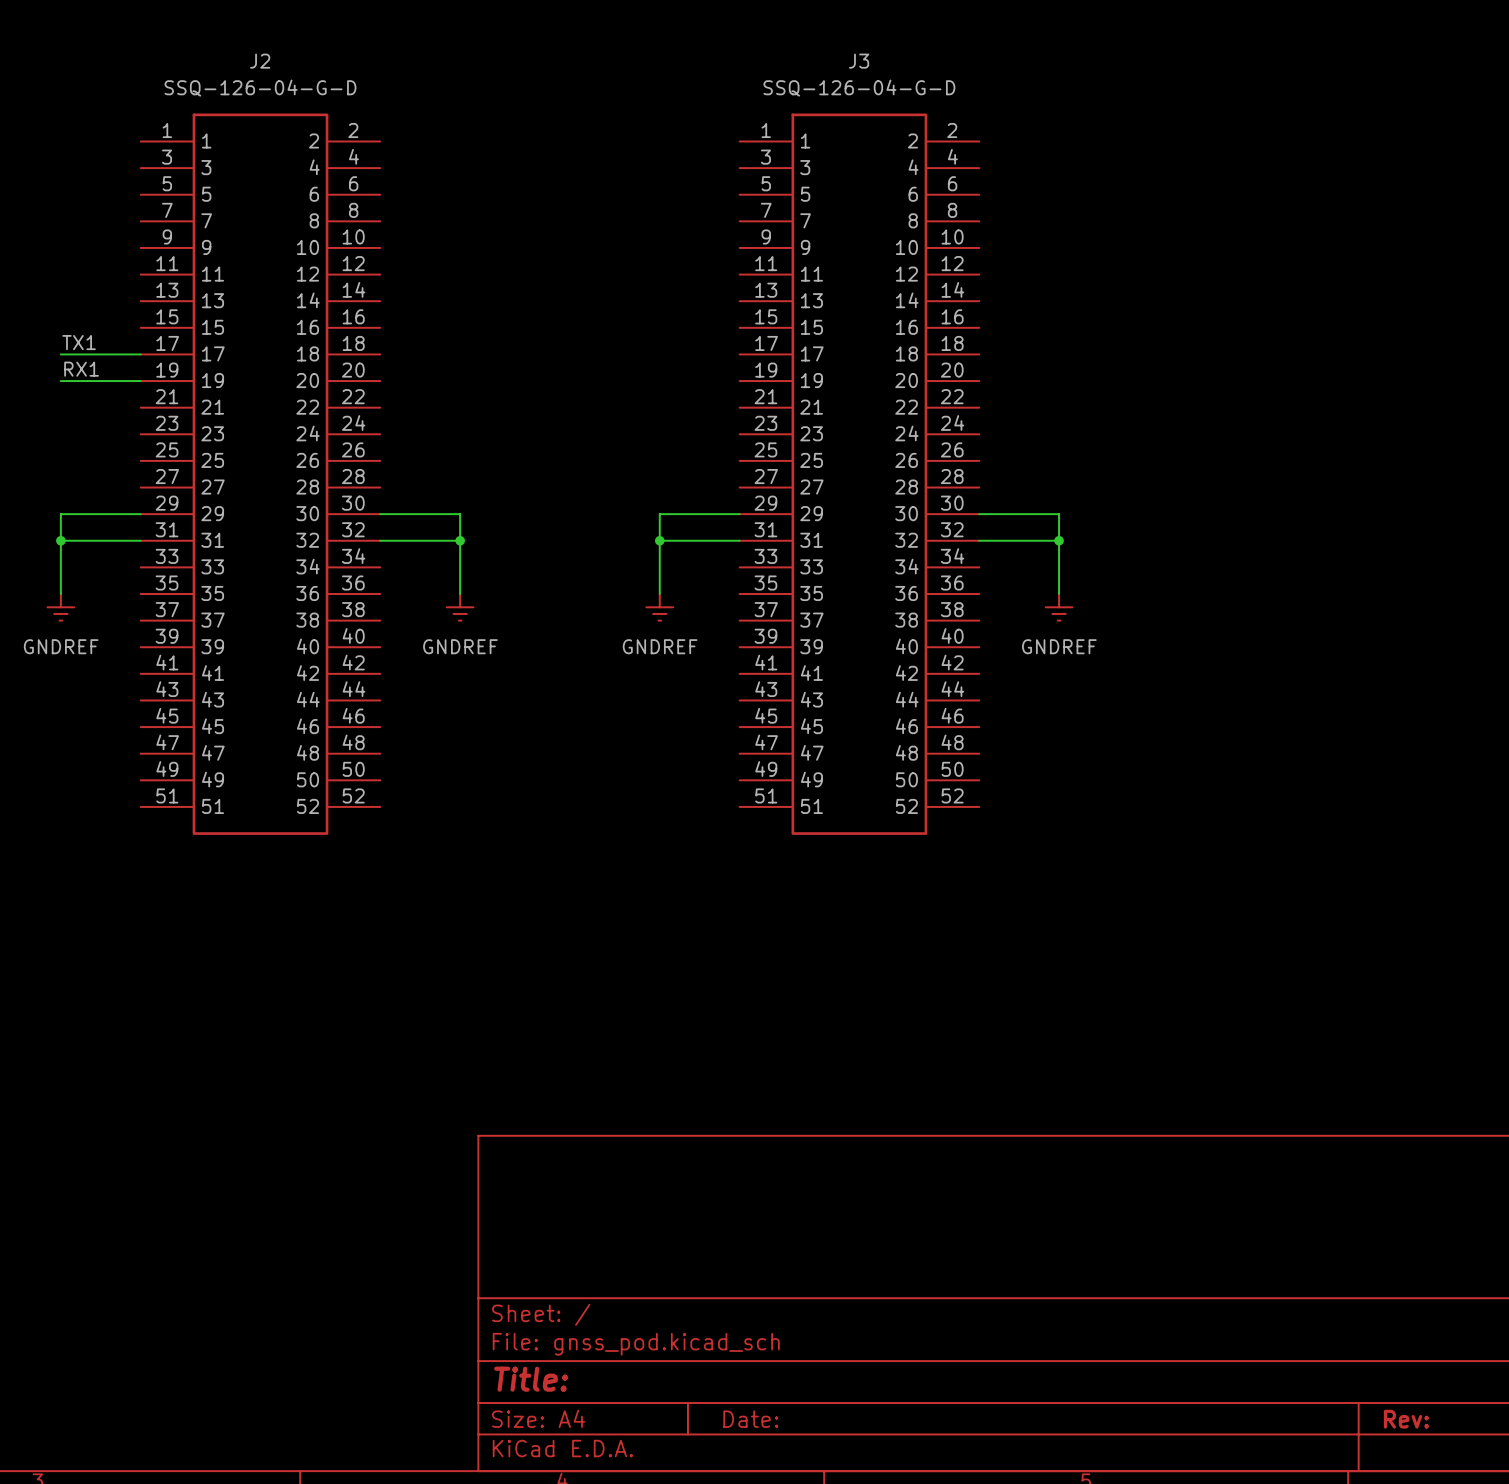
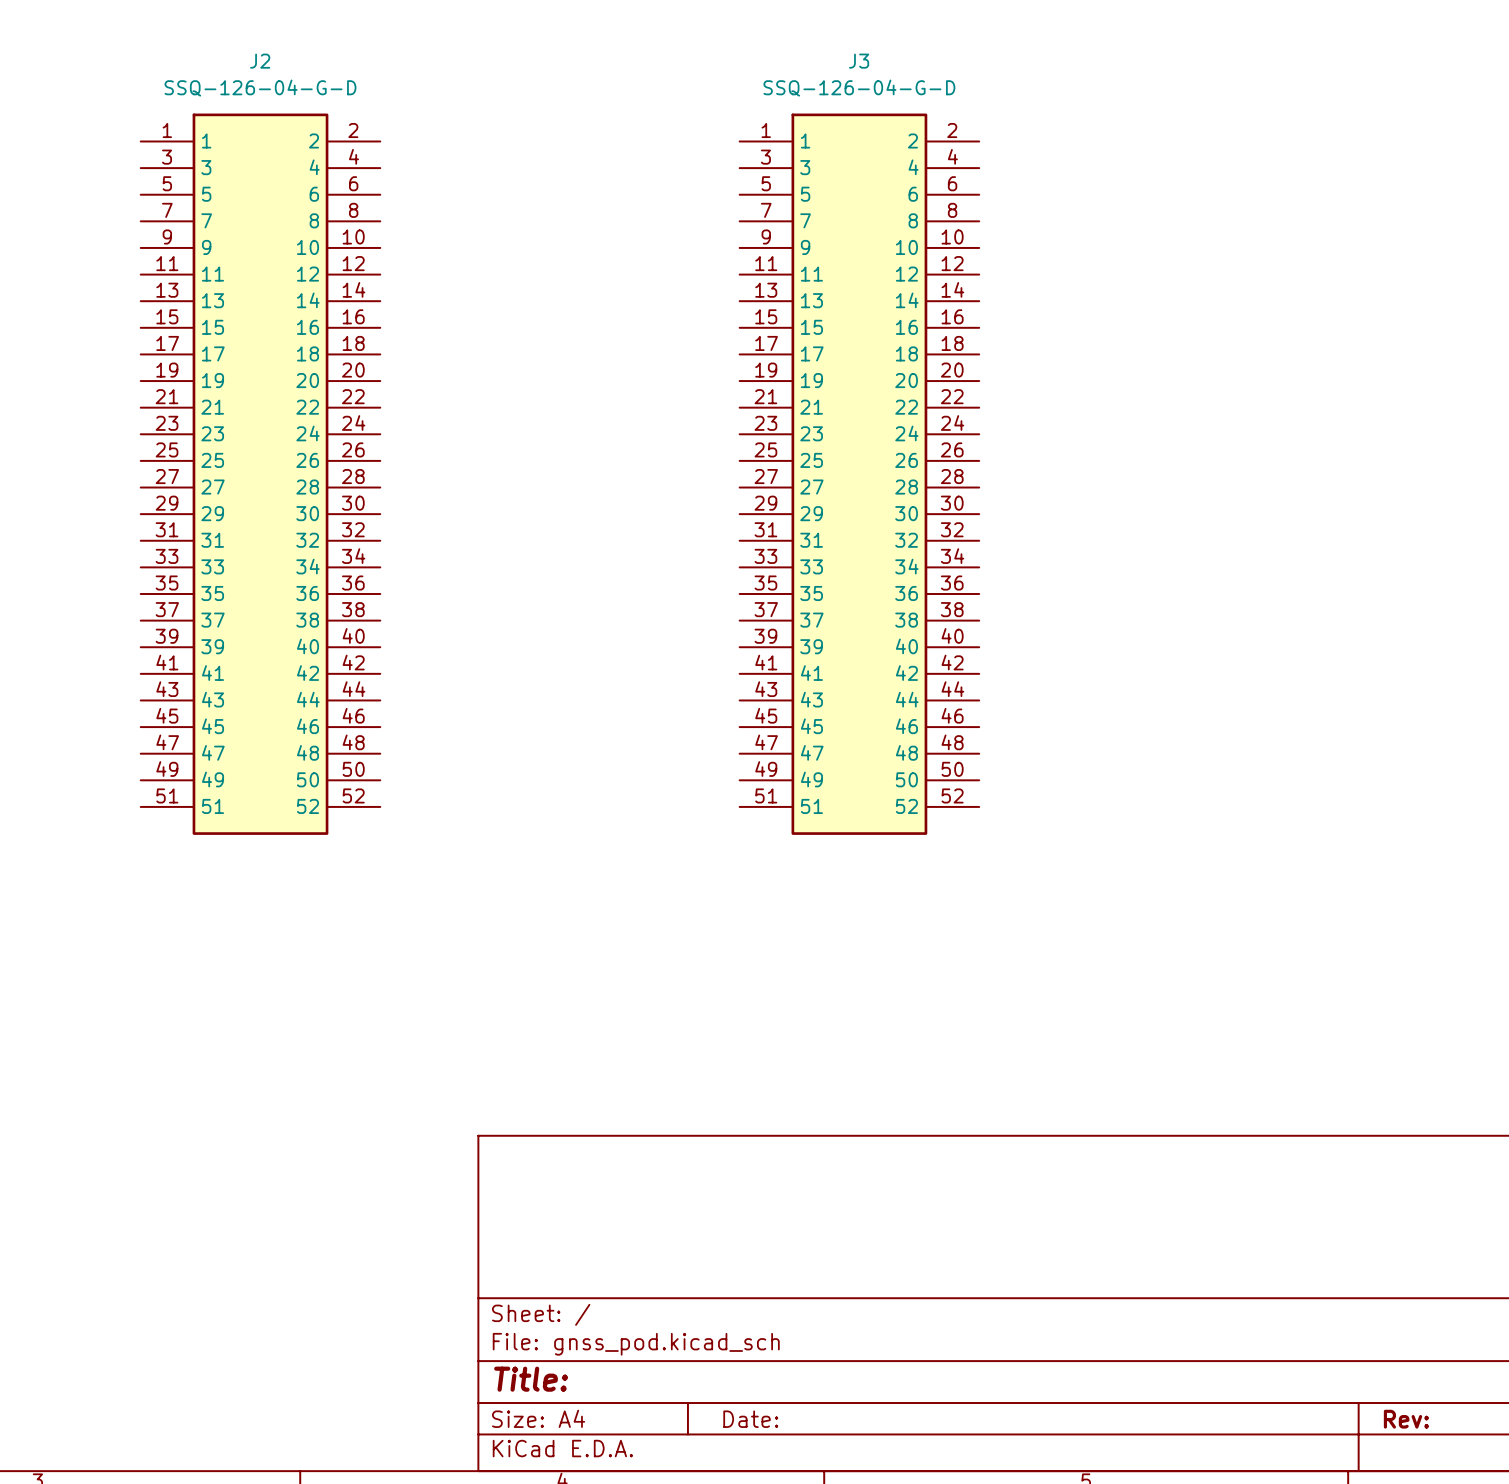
label: TX1 (79, 342) -> none
wire: (60, 354) (140, 354) -> none
label: RX1 (81, 369) -> none
wire: (60, 381) (140, 381) -> none
wire: (140, 514) (60, 514) (60, 593) -> none
wire: (380, 514) (460, 514) (460, 593) -> none
wire: (739, 514) (659, 514) (659, 593) -> none
wire: (979, 514) (1059, 514) (1059, 593) -> none
wire: (60, 540) (140, 540) -> none
junction: (60, 540) -> none
wire: (380, 540) (460, 540) -> none
junction: (460, 540) -> none
wire: (659, 540) (739, 540) -> none
junction: (659, 540) -> none
wire: (979, 540) (1059, 540) -> none
junction: (1059, 540) -> none
power symbol: GNDREF (60, 607) -> none
power symbol: GNDREF (460, 607) -> none
power symbol: GNDREF (659, 607) -> none
power symbol: GNDREF (1059, 607) -> none

